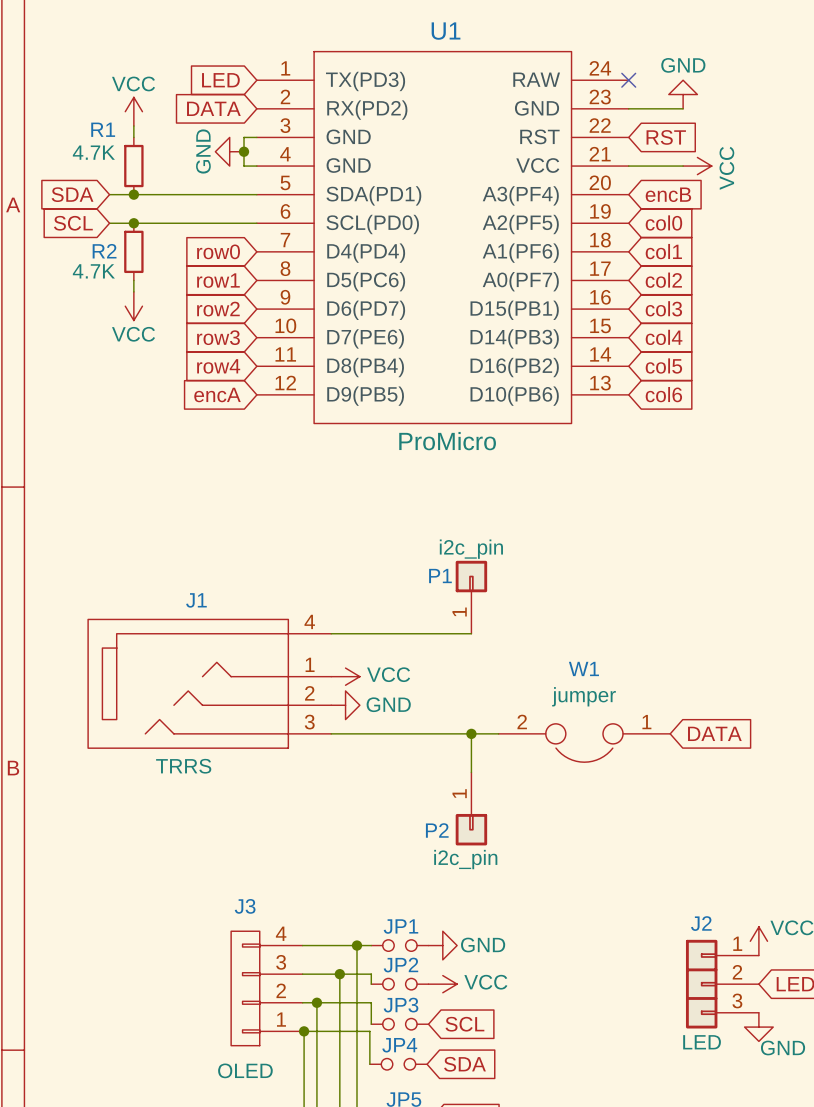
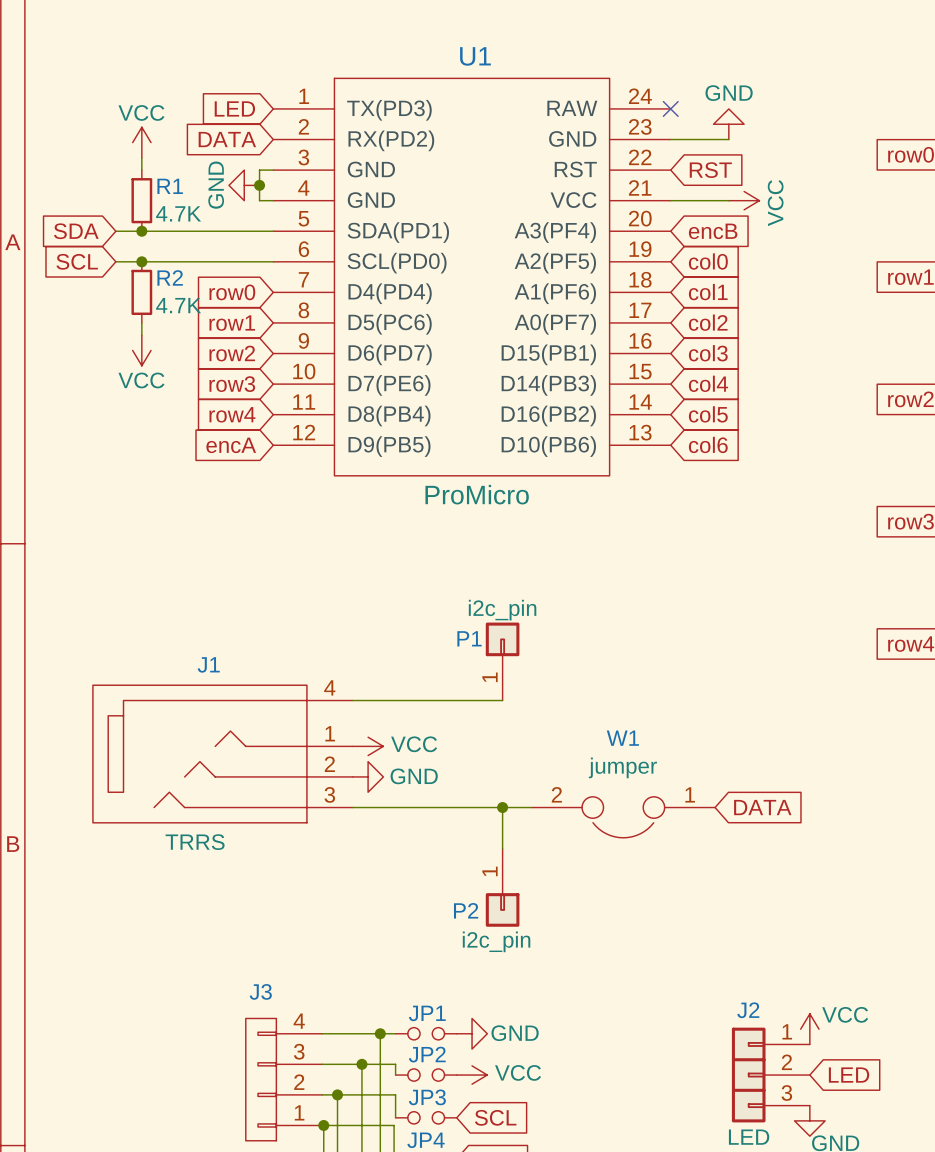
R1 name position: R1 (103, 129) -> R1 (170, 186)
R1 value position: 4.7K (93, 152) -> 4.7K (178, 213)
R2 name position: R2 (104, 251) -> R2 (170, 277)
R2 value position: 4.7K (93, 271) -> 4.7K (178, 305)

